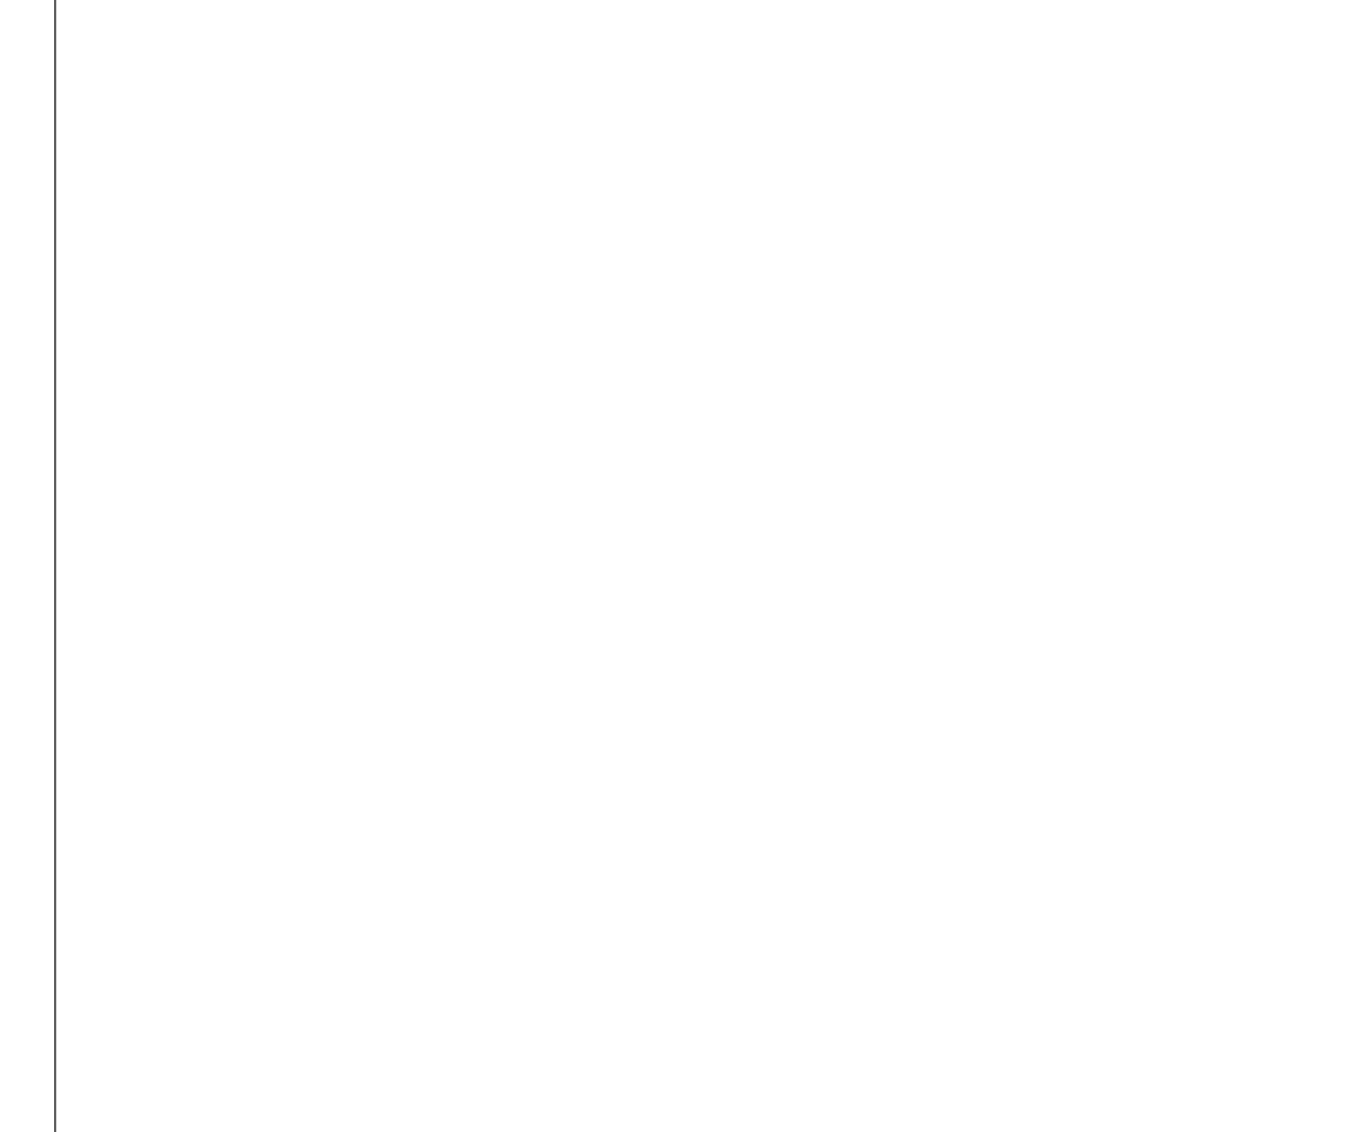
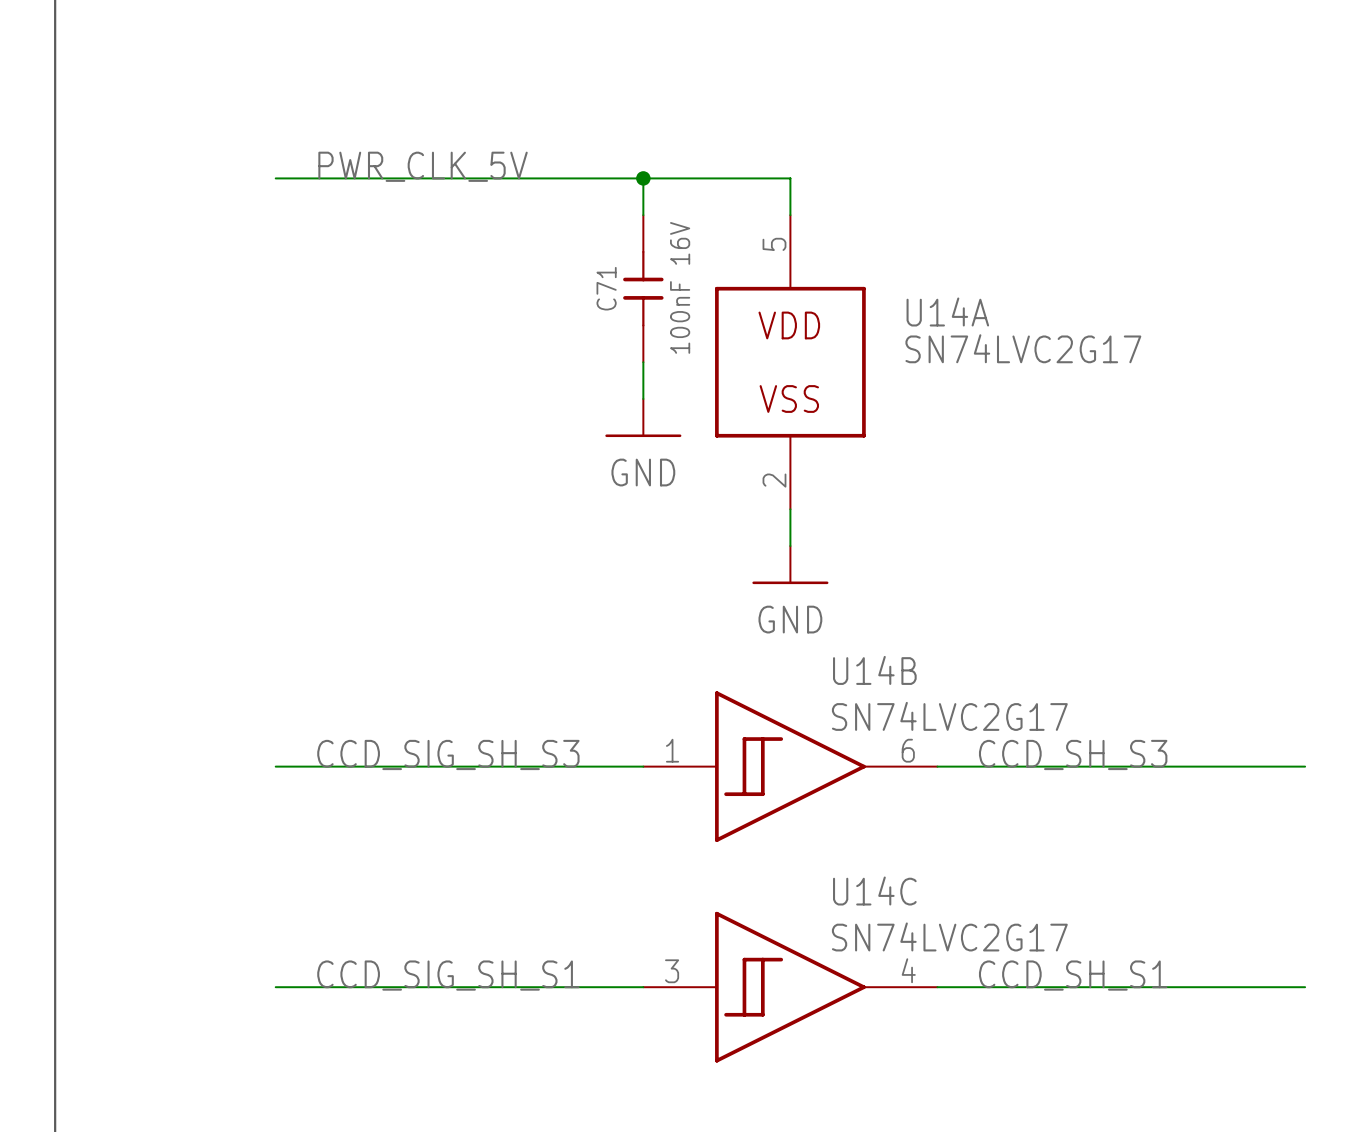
label: none -> PWR_CLK_5V (423, 166)
wire: none -> (275, 178) (790, 178) (790, 215)
wire: none -> (643, 178) (643, 215)
junction: none -> (643, 178)
C71: none -> 100nF 16V (643, 288)
wire: none -> (643, 362) (643, 398)
U14A: none -> SN74LVC2G17 (790, 362)
power symbol: none -> GND (643, 418)
wire: none -> (790, 509) (790, 546)
power symbol: none -> GND (790, 565)
label: none -> CCD_SIG_SH_S3 (448, 754)
label: none -> CCD_SH_S3 (1073, 754)
wire: none -> (275, 766) (643, 766)
U14B: none -> SN74LVC2G17 (790, 766)
wire: none -> (937, 766) (1305, 766)
label: none -> CCD_SIG_SH_S1 (448, 975)
label: none -> CCD_SH_S1 (1073, 975)
wire: none -> (275, 987) (643, 987)
U14C: none -> SN74LVC2G17 (790, 987)
wire: none -> (937, 987) (1305, 987)

